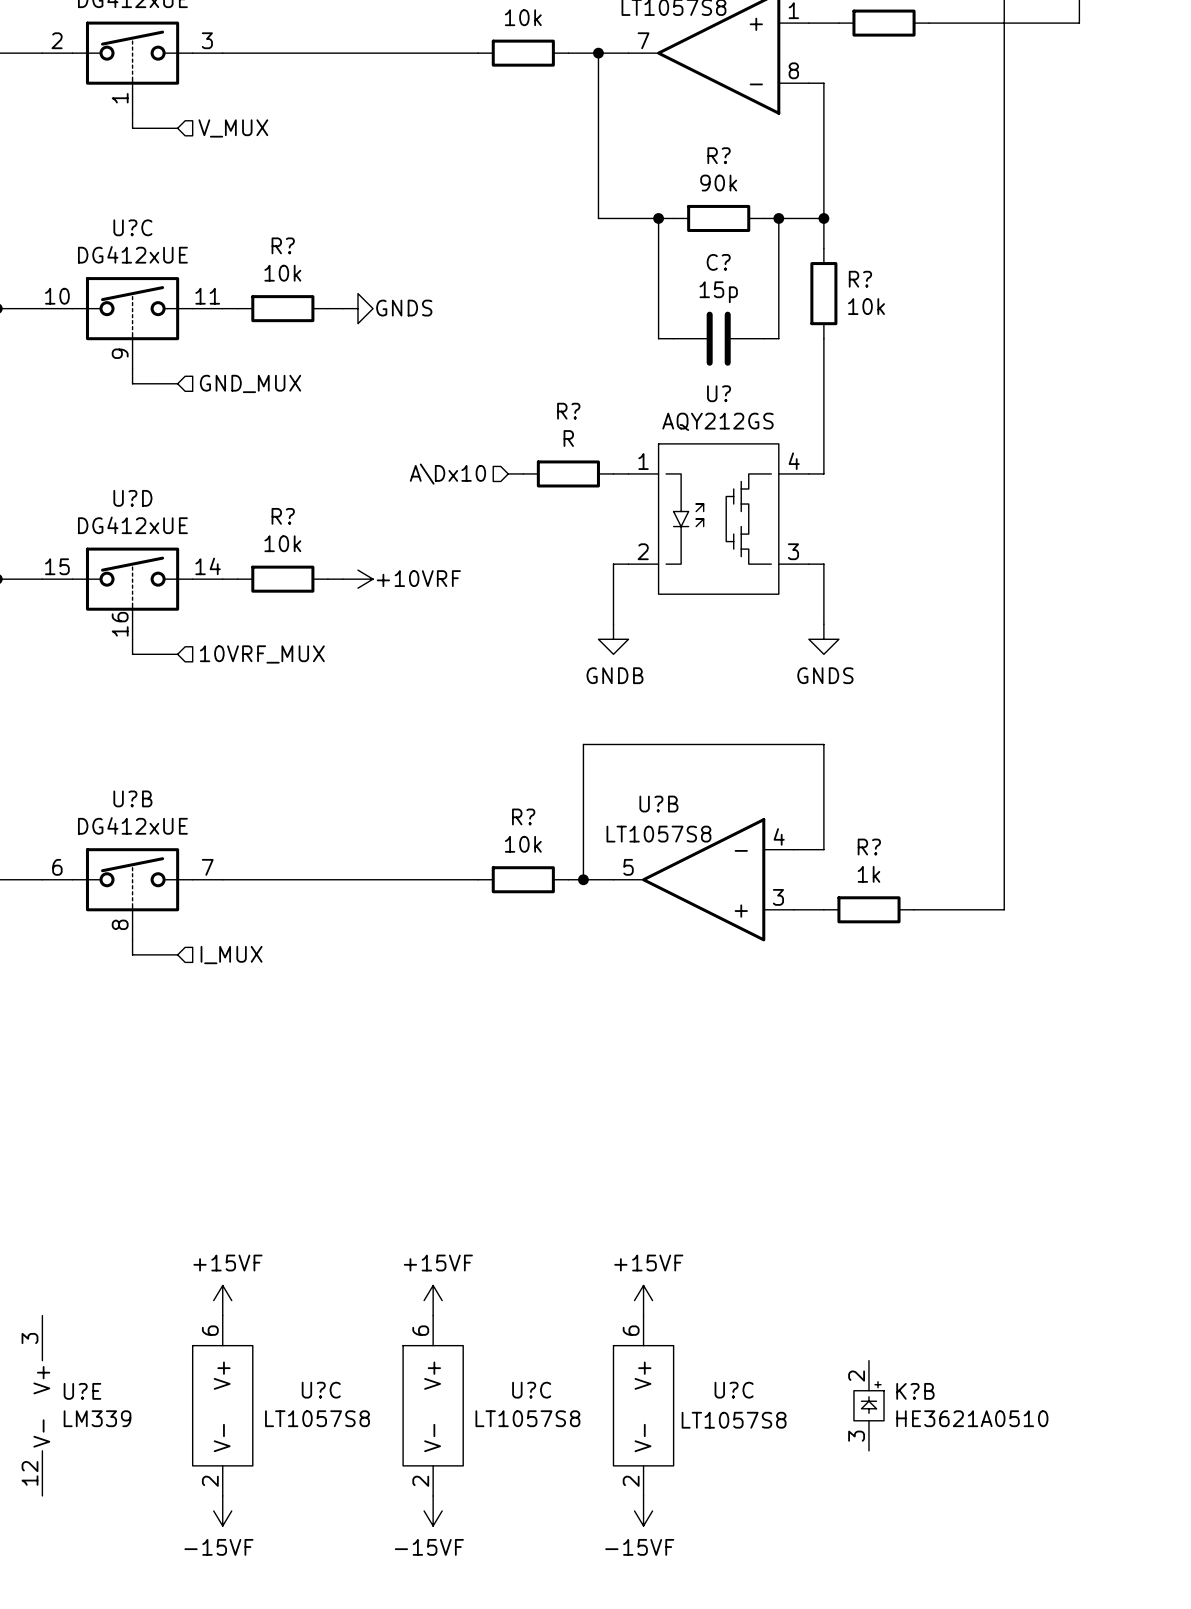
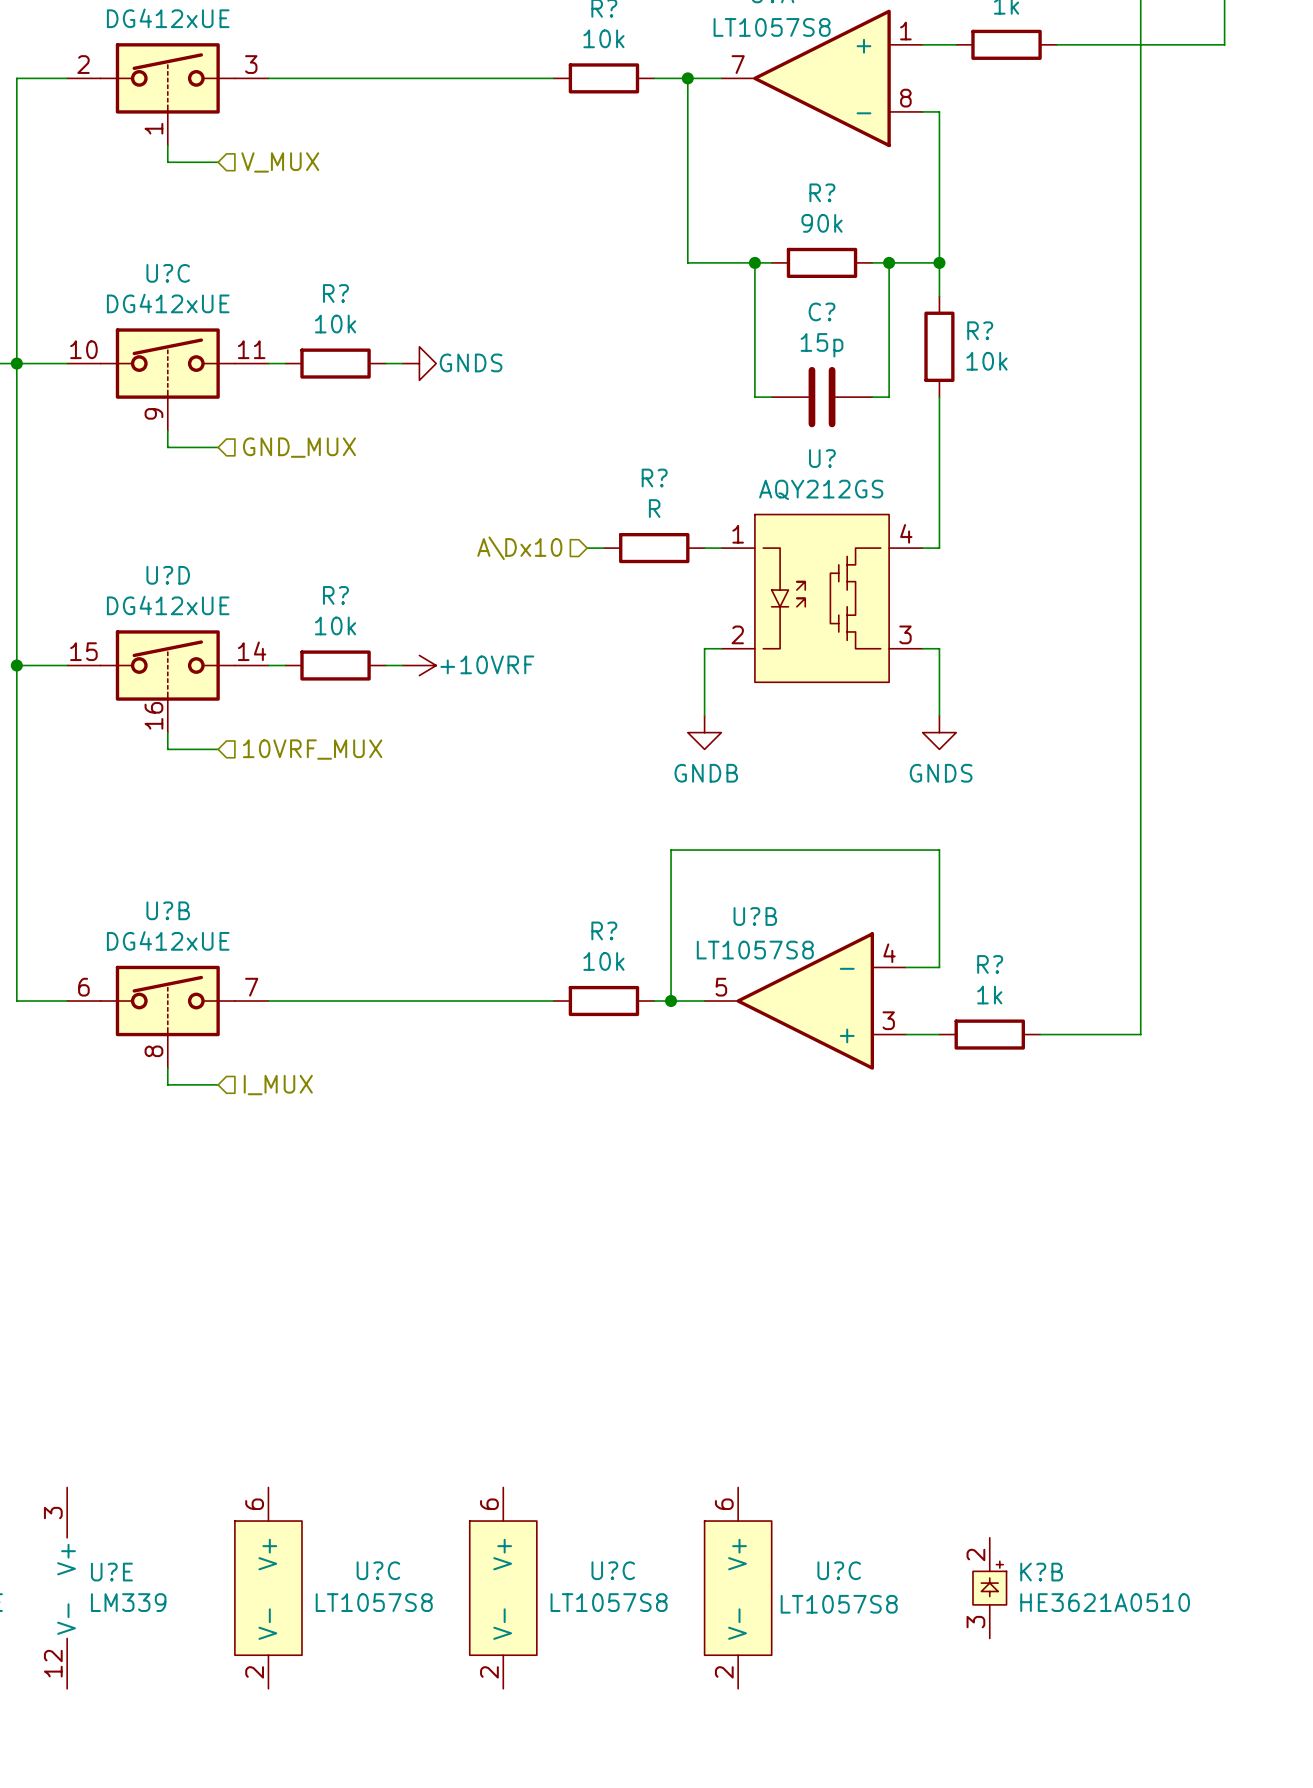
power symbol: +15VF (222, 1300) -> none
power symbol: +15VF (433, 1300) -> none
power symbol: +15VF (643, 1300) -> none
power symbol: -15VF (222, 1510) -> none
power symbol: -15VF (433, 1510) -> none
power symbol: -15VF (643, 1510) -> none

